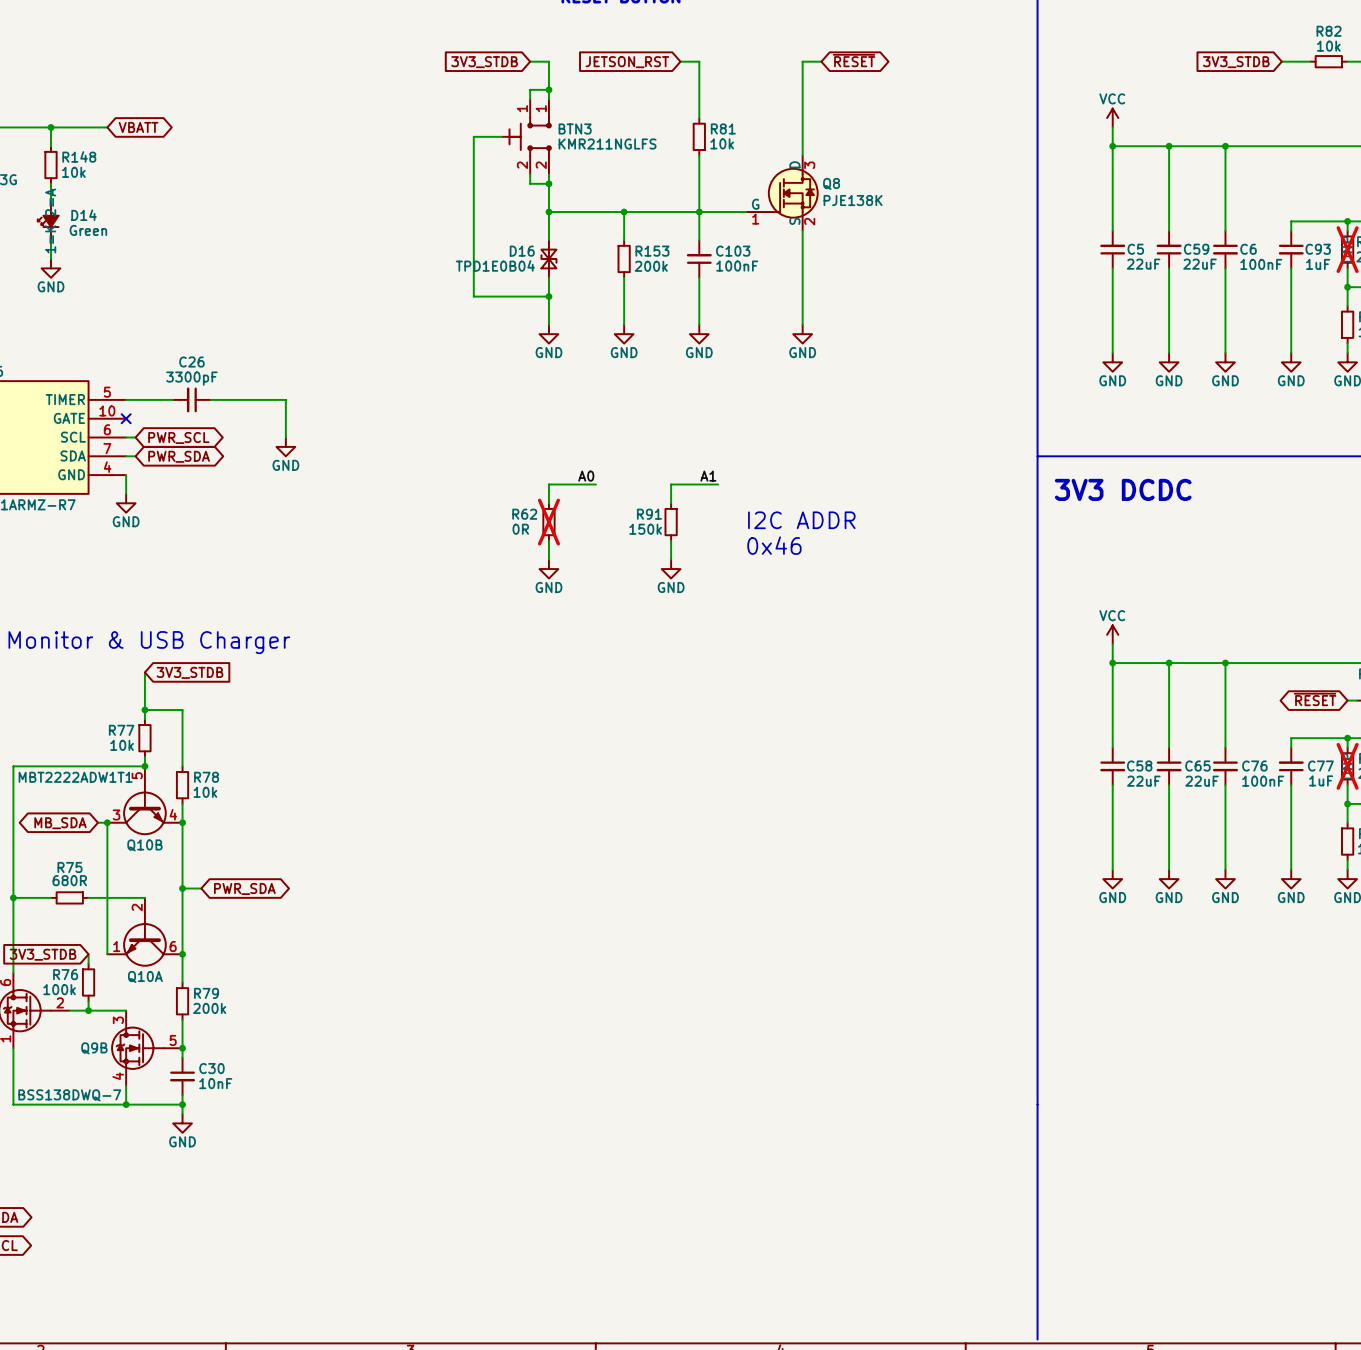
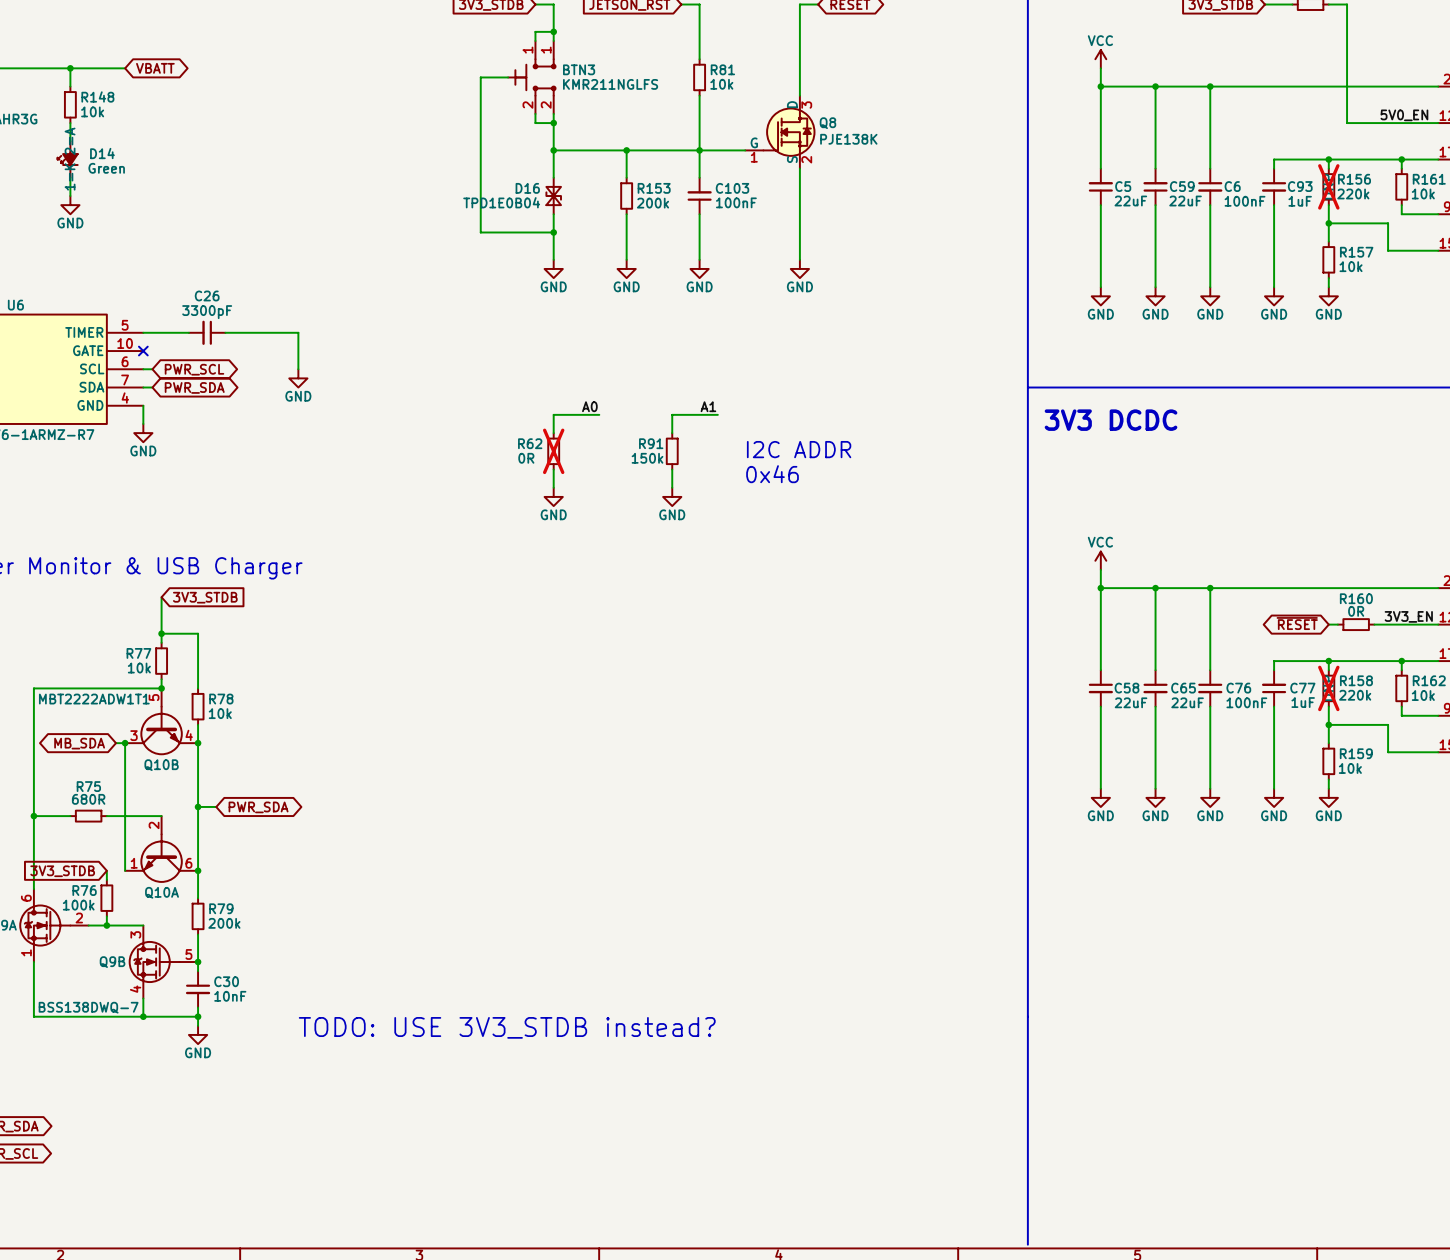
text: none -> TODO: USE 3V3_STDB instead? (507, 1027)

